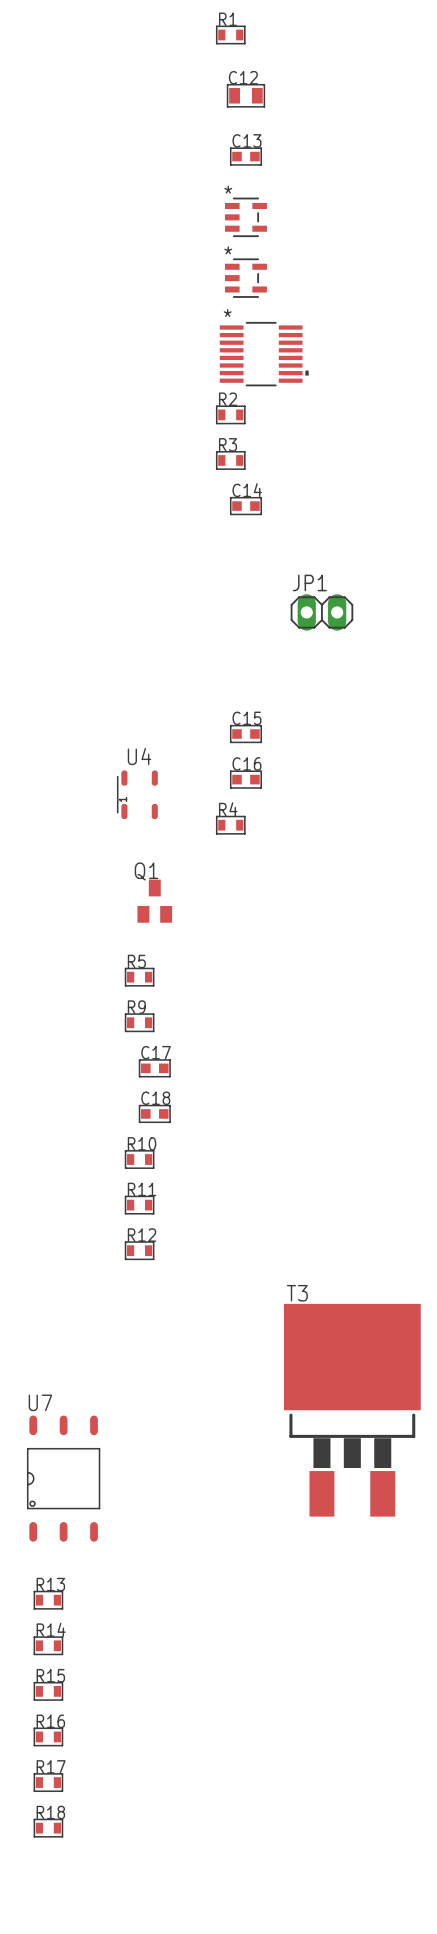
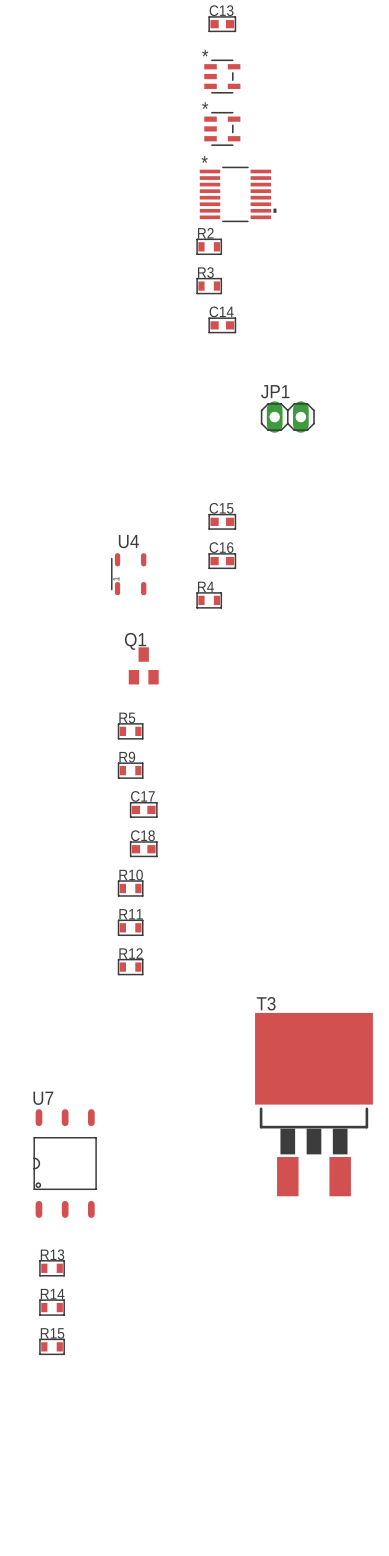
R16: (48, 1736) -> none
R17: (48, 1782) -> none
R18: (48, 1828) -> none

